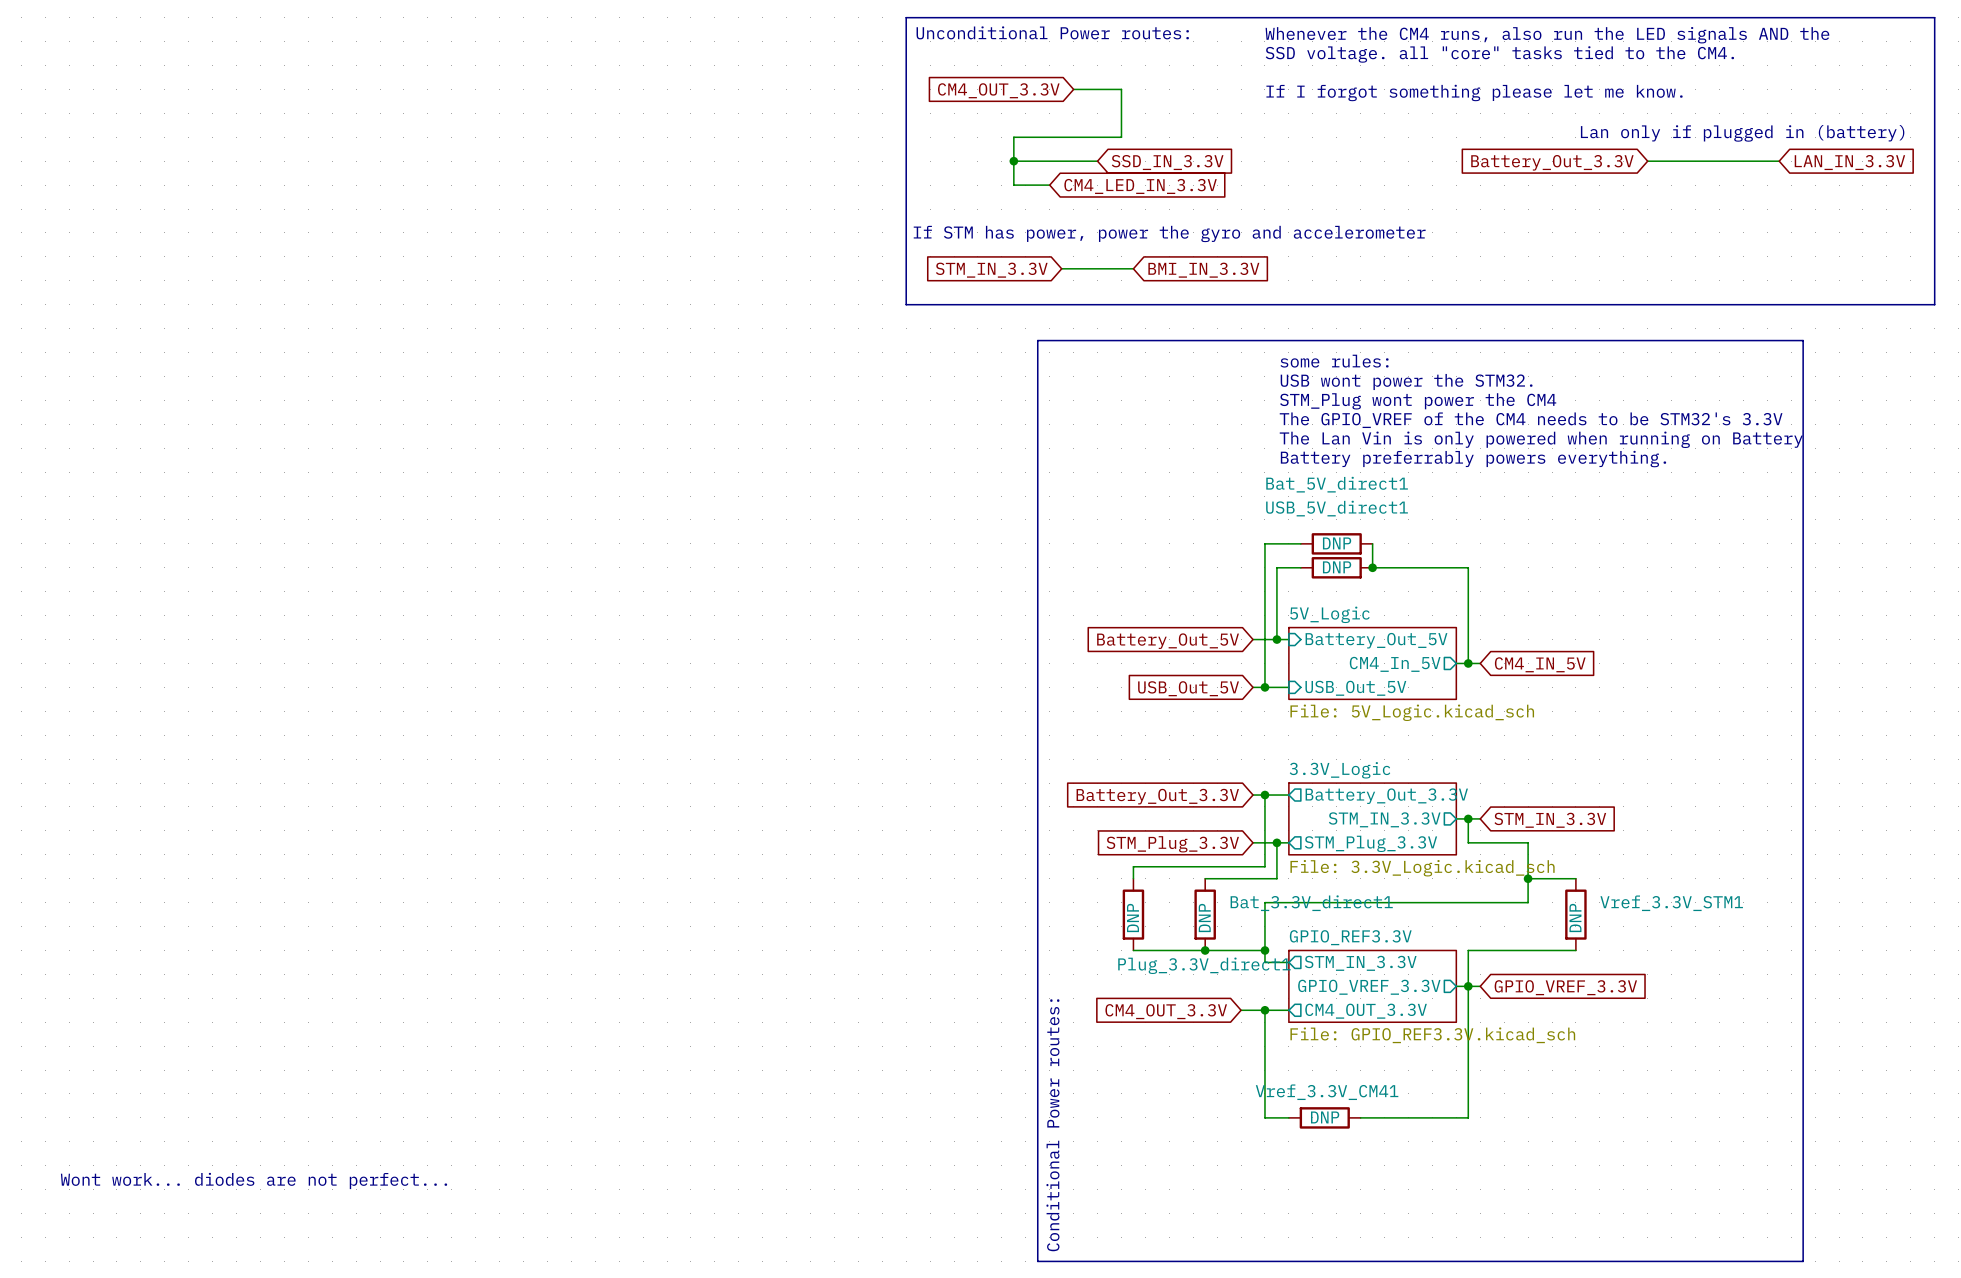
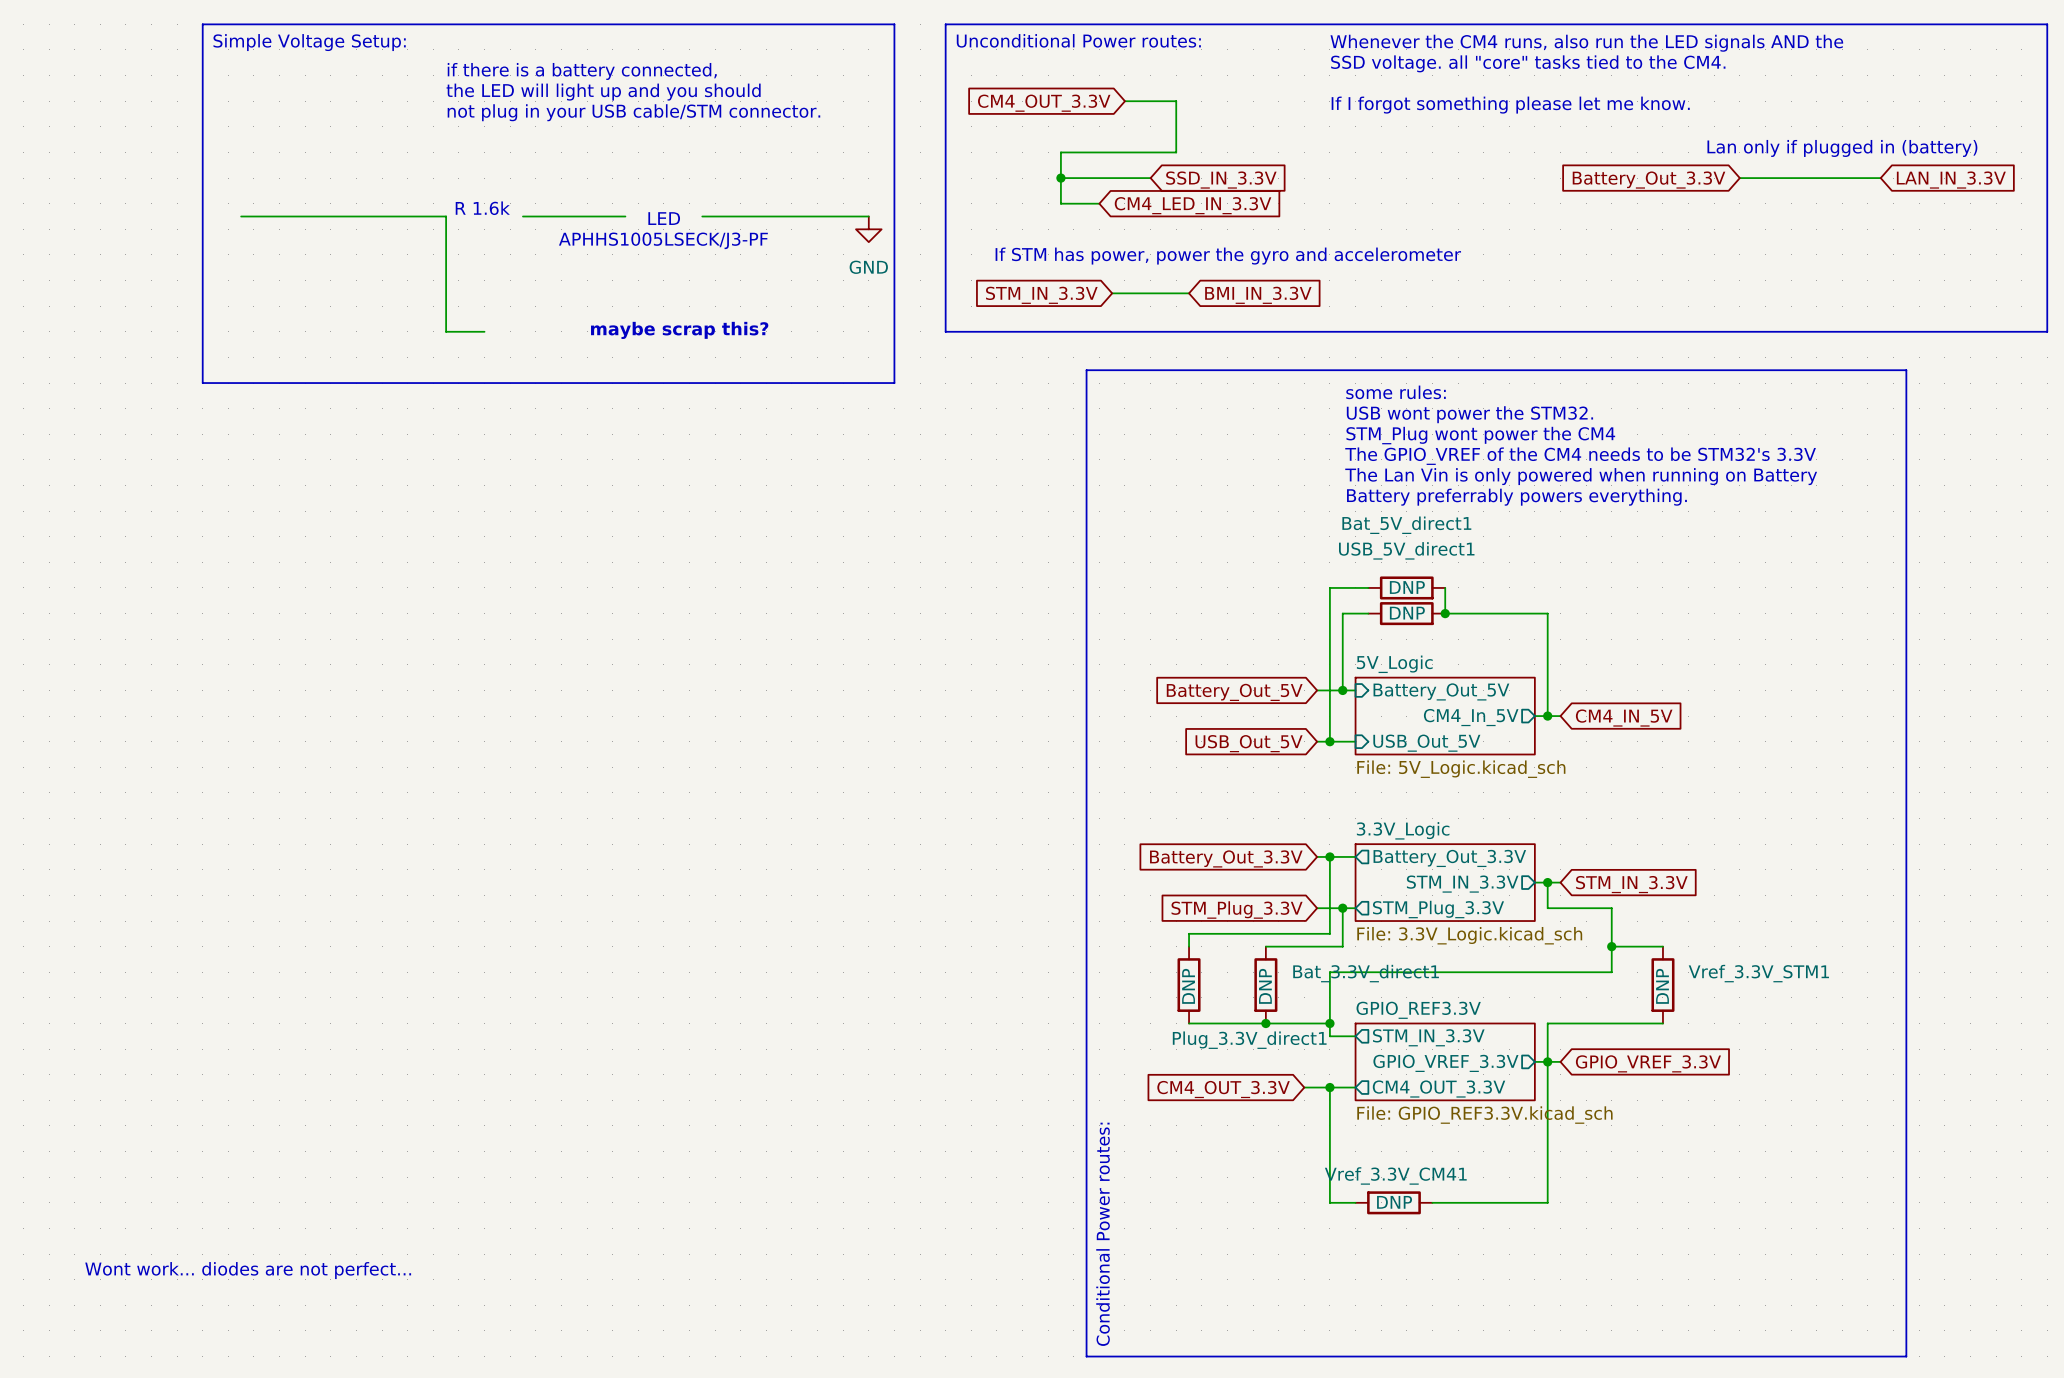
line: none -> (202, 24) (894, 24) (894, 383) (202, 383) (202, 24)
text: none -> Simple Voltage Setup: (309, 42)
text: none -> if there is a battery connected, (582, 71)
text: none -> the LED will light up and you should (603, 92)
text: none -> not plug in your USB cable/STM connector. (633, 112)
text: none -> R 1.6k (482, 208)
wire: none -> (241, 216) (446, 216) (446, 331) (484, 331)
wire: none -> (522, 216) (625, 216)
wire: none -> (702, 216) (868, 216)
text: none -> LED (664, 218)
power symbol: none -> GND (868, 229)
text: none -> APHHS1005LSECK/J3-PF (663, 240)
text: none -> maybe scrap this? (679, 330)

